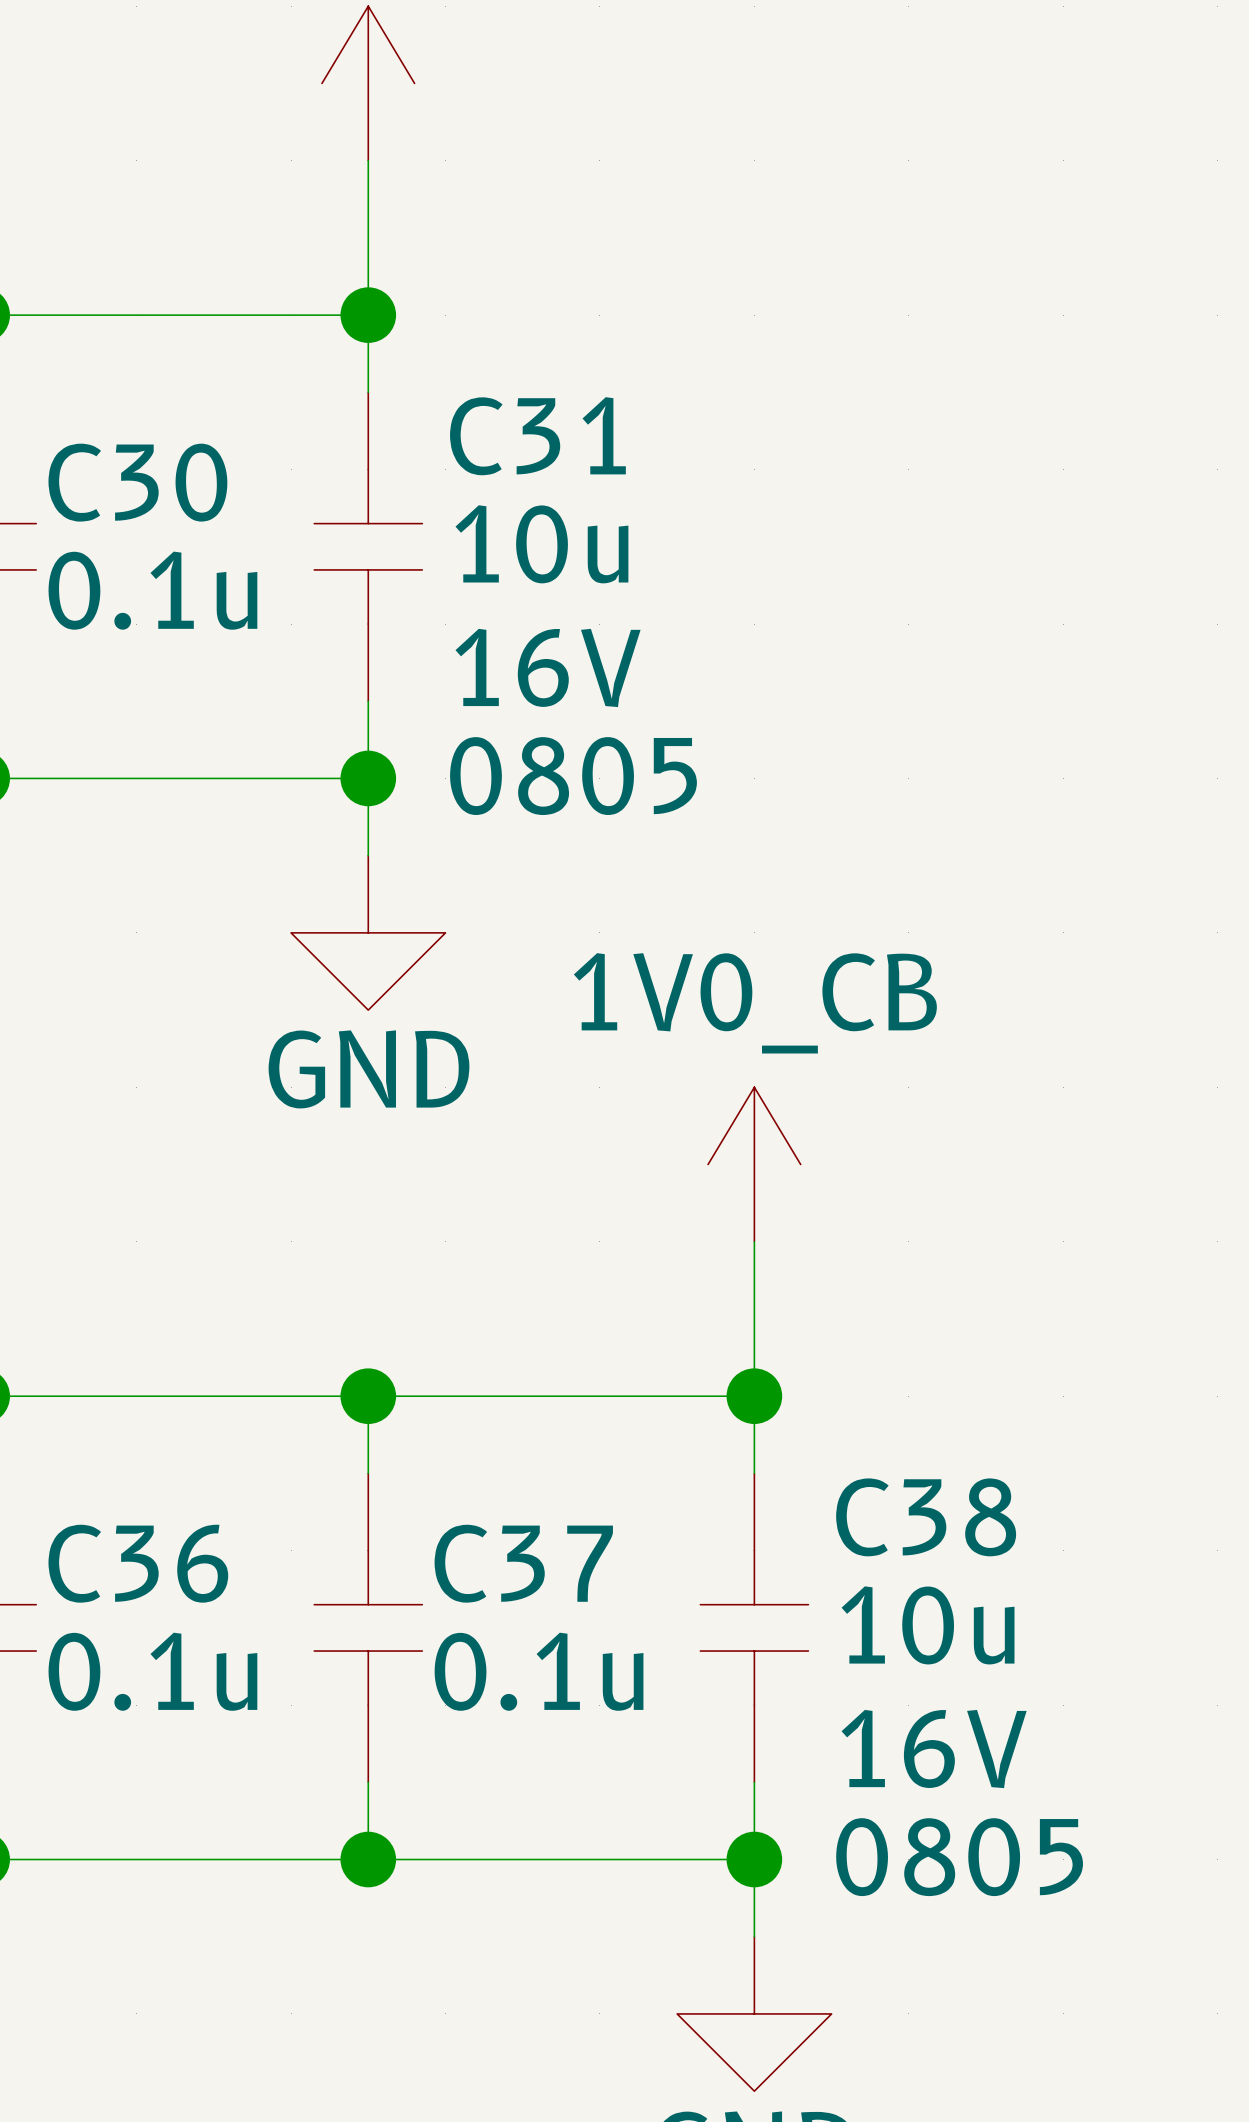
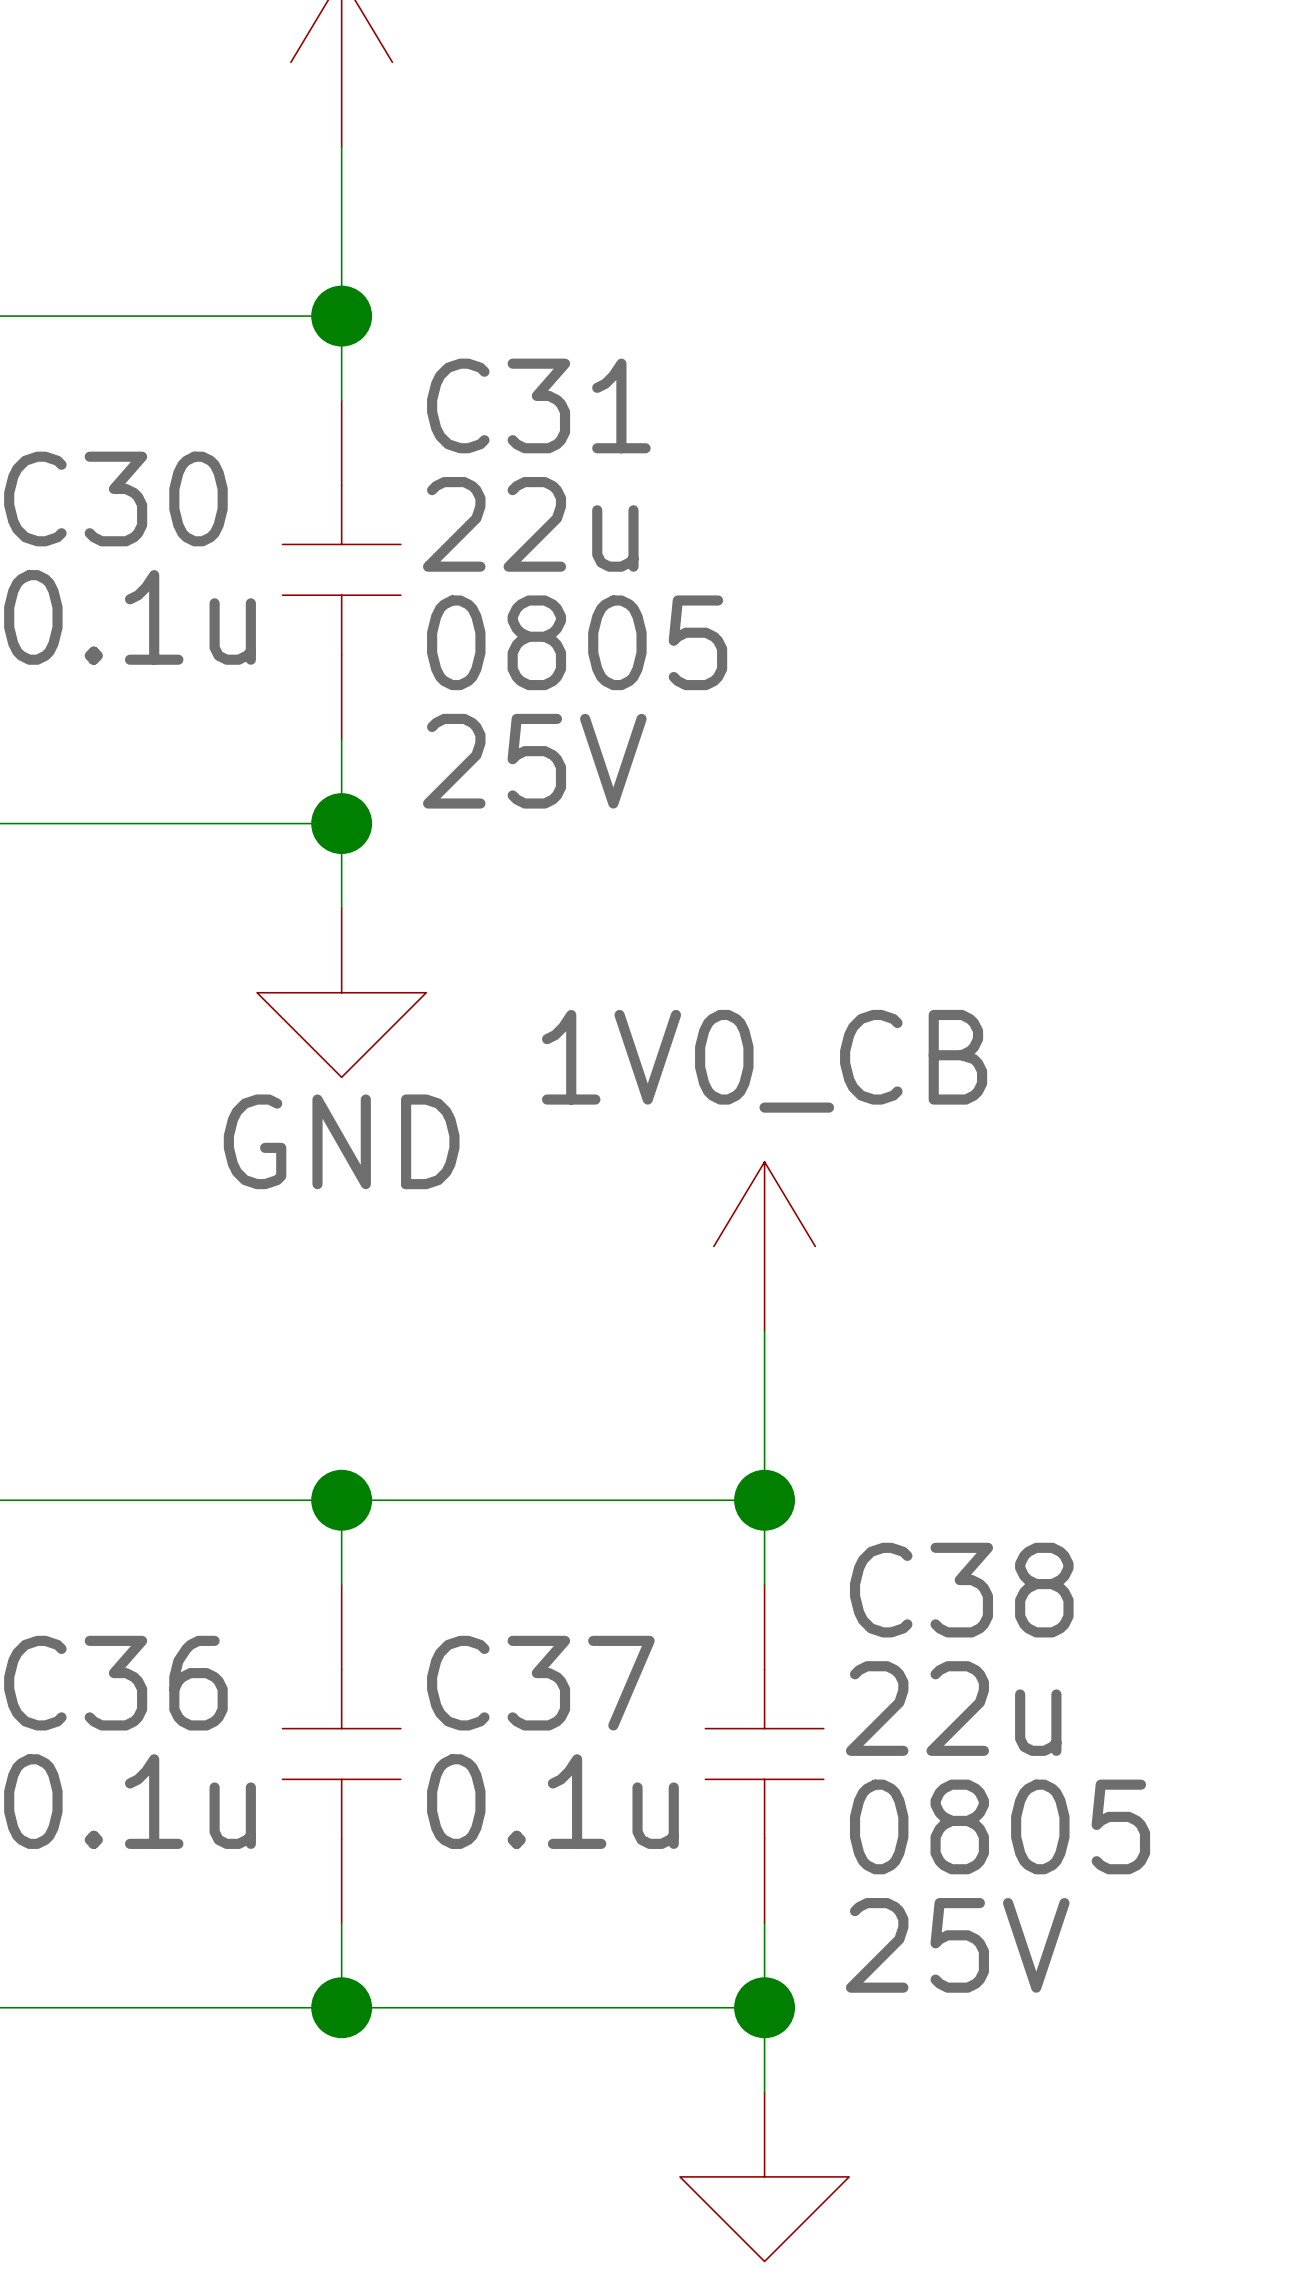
C31 name position: C31 (537, 436) -> C31 (538, 405)
C31 value: 10u (541, 544) -> 22u (530, 524)
C31 text: 16V (548, 667) -> 25V (534, 761)
C31 text position: 0805 (573, 776) -> 0805 (577, 642)
C38 name position: C38 (926, 1517) -> C38 (961, 1590)
C38 value: 10u (928, 1625) -> 22u (953, 1708)
C38 text: 16V (934, 1749) -> 25V (957, 1945)
C38 text position: 0805 (959, 1857) -> 0805 (1000, 1826)

